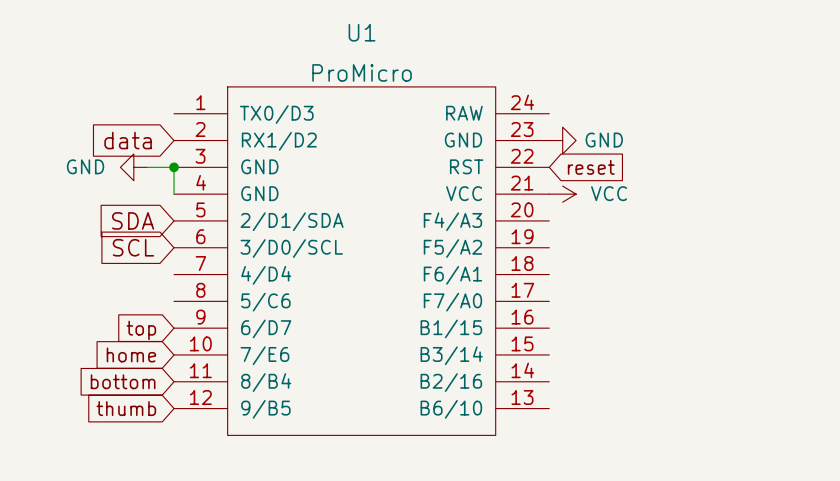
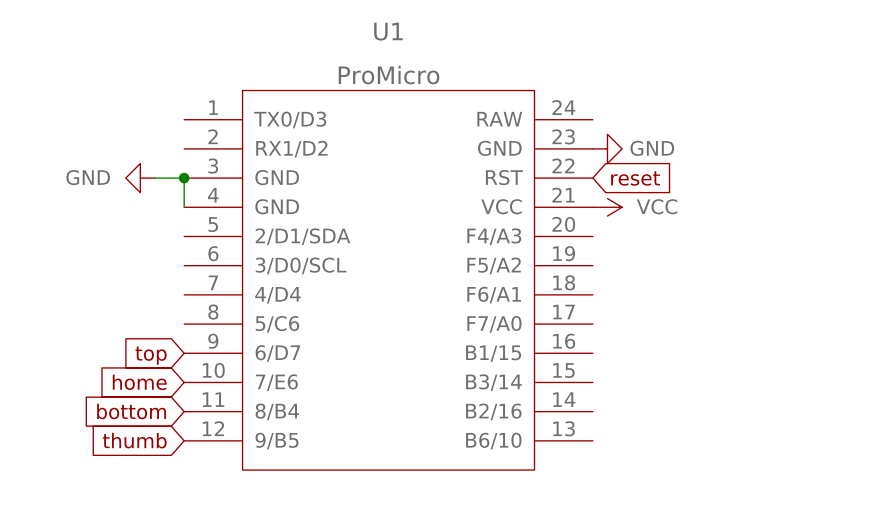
global label: data (128, 140) -> none
global label: SDA (133, 220) -> none
global label: SCL (133, 247) -> none

